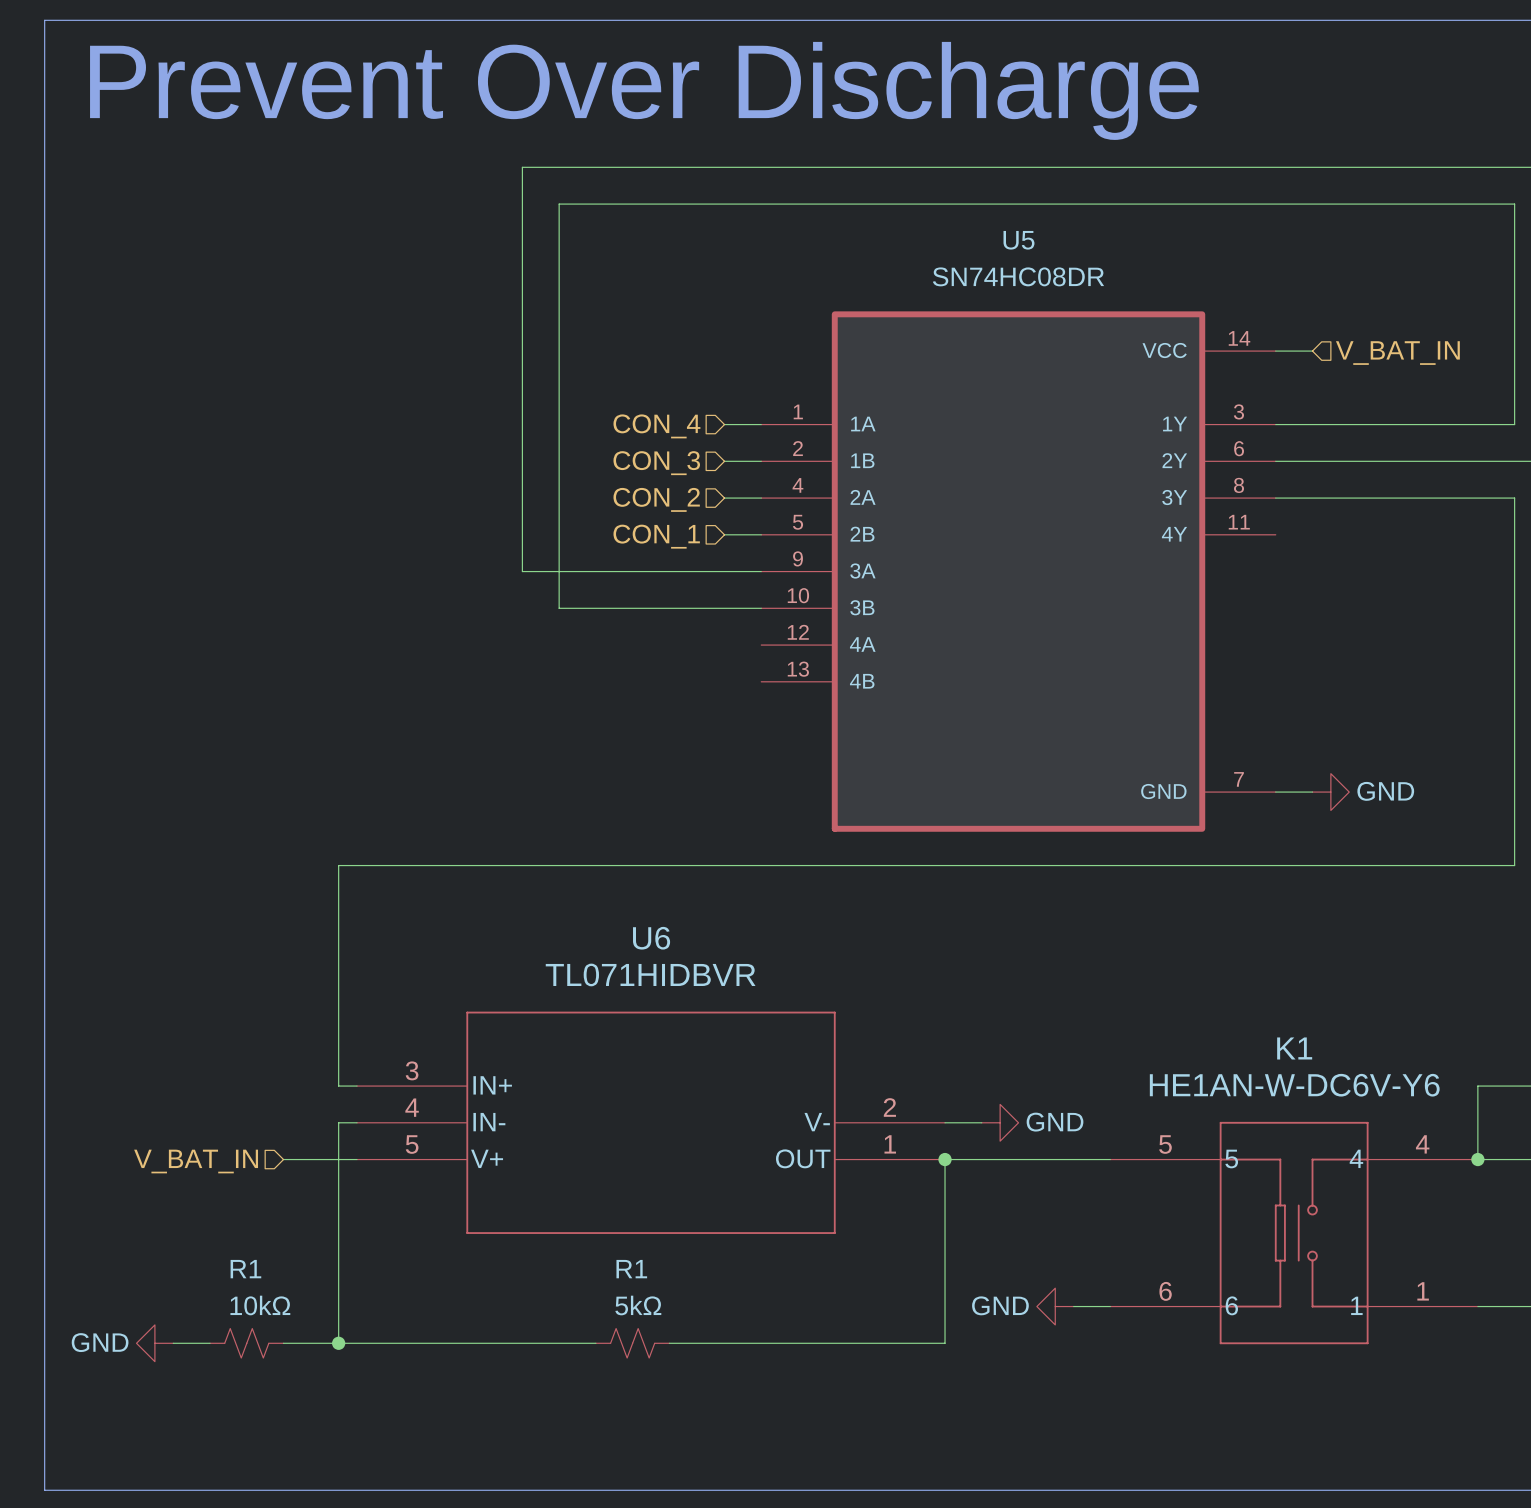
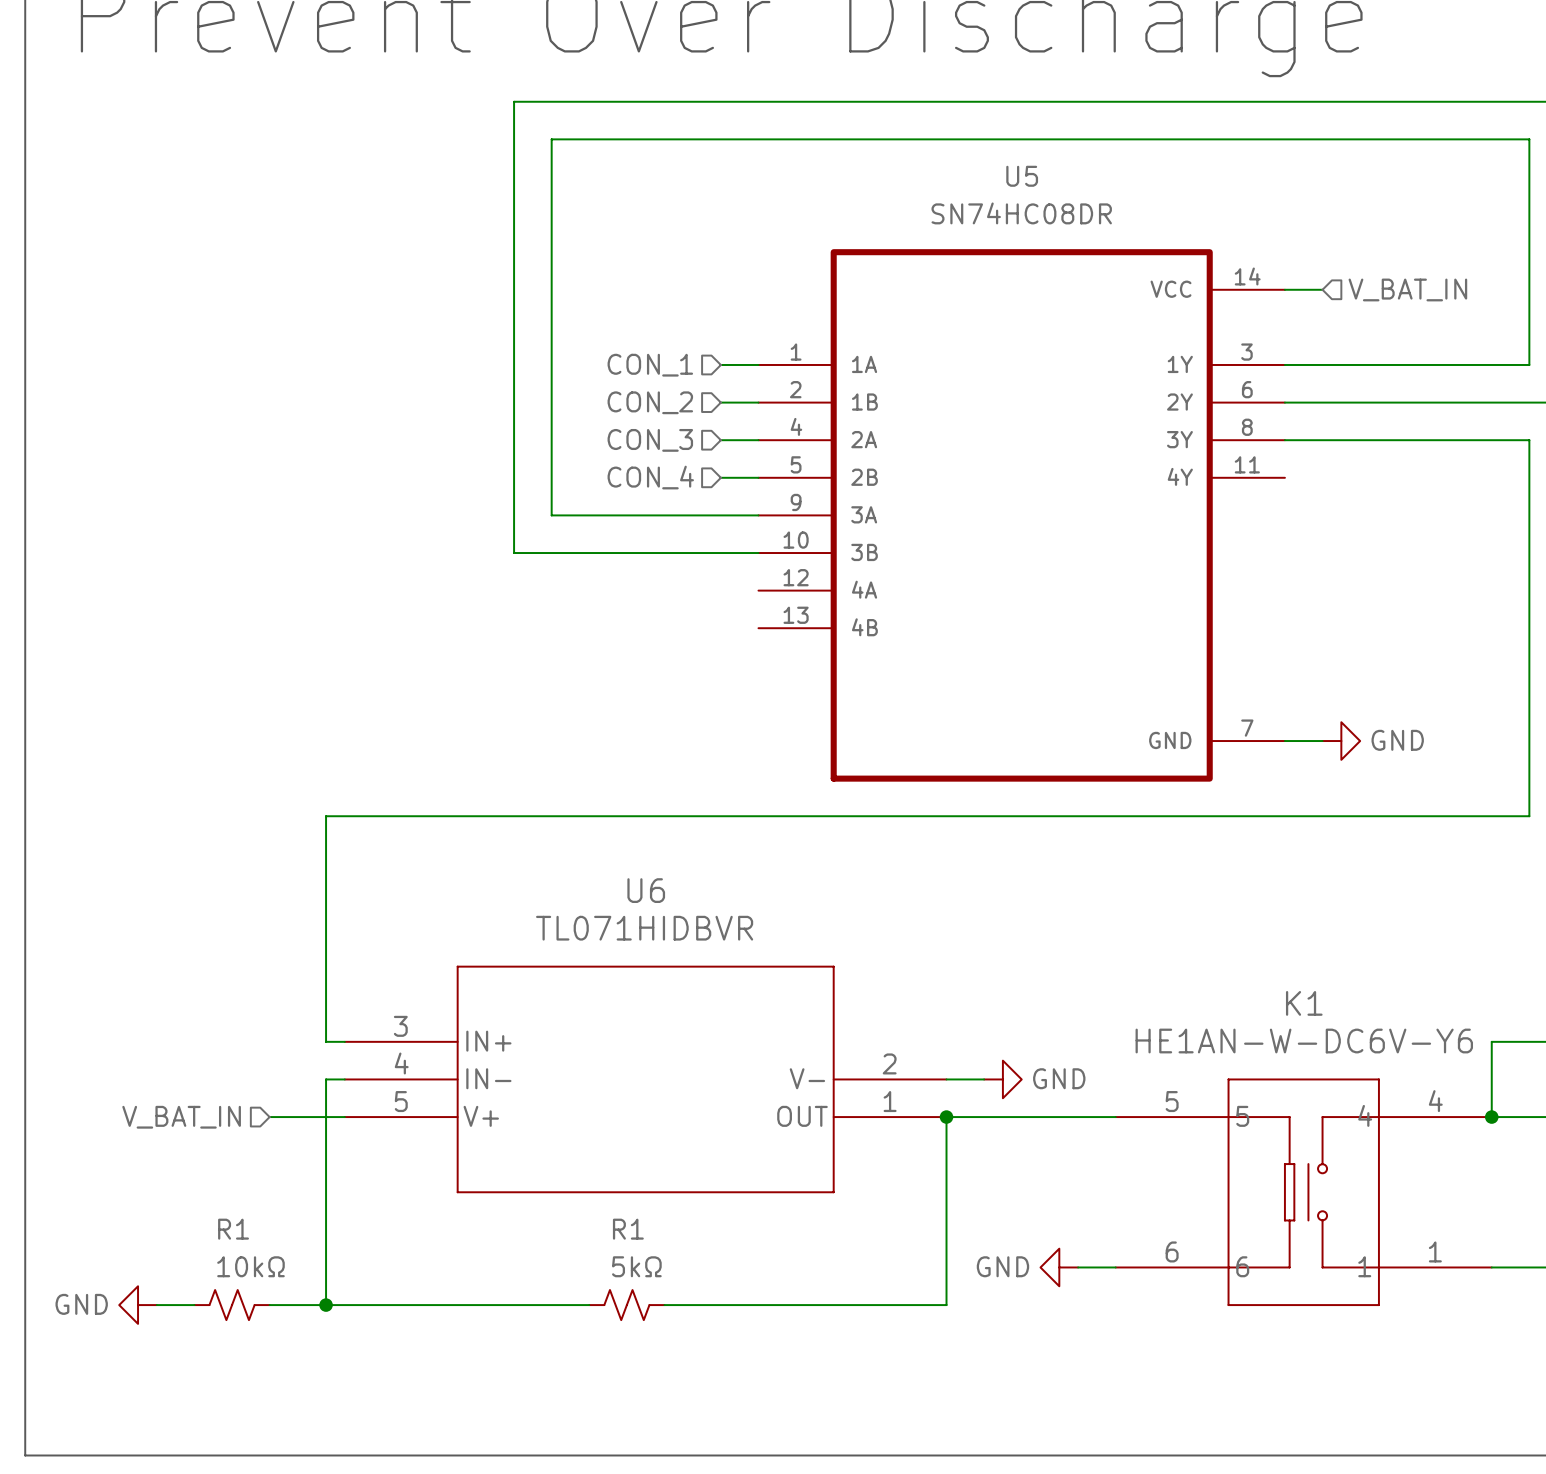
hierarchical label: CON_4 (656, 426) -> CON_1 (650, 365)
hierarchical label: CON_3 (656, 463) -> CON_2 (650, 402)
hierarchical label: CON_2 (656, 499) -> CON_3 (650, 440)
hierarchical label: CON_1 (656, 536) -> CON_4 (650, 477)
wire: (522, 571) (559, 571) (559, 608) -> (514, 515) (514, 553) (551, 553)

